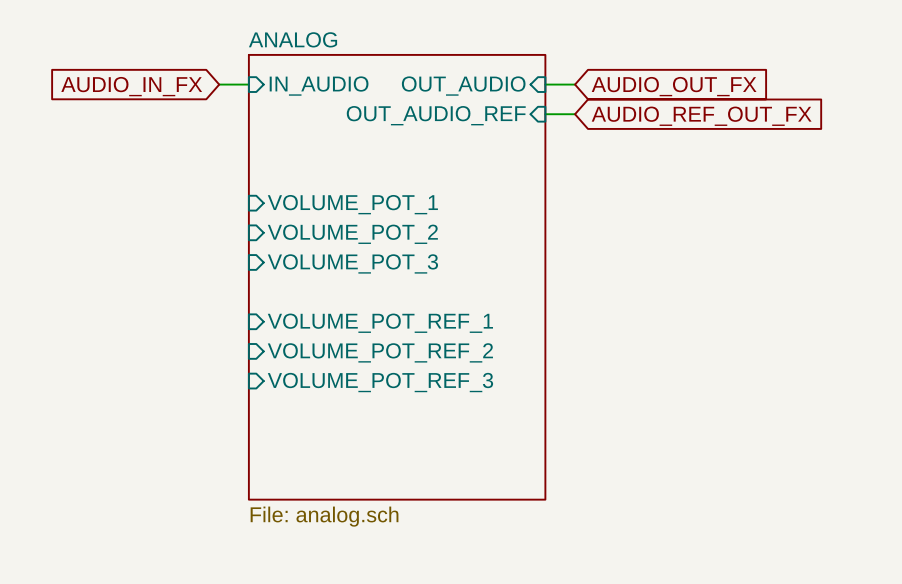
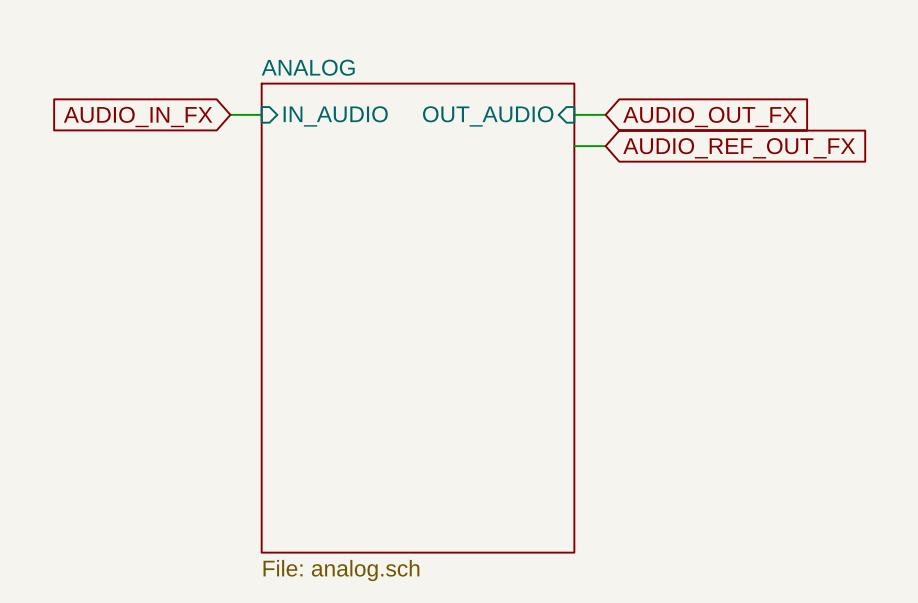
sheet pin: OUT_AUDIO_REF (436, 115) -> none
sheet pin: VOLUME_POT_1 (352, 204) -> none
sheet pin: VOLUME_POT_2 (352, 234) -> none
sheet pin: VOLUME_POT_3 (352, 263) -> none
sheet pin: VOLUME_POT_REF_1 (380, 323) -> none
sheet pin: VOLUME_POT_REF_2 (380, 352) -> none
sheet pin: VOLUME_POT_REF_3 (380, 382) -> none

